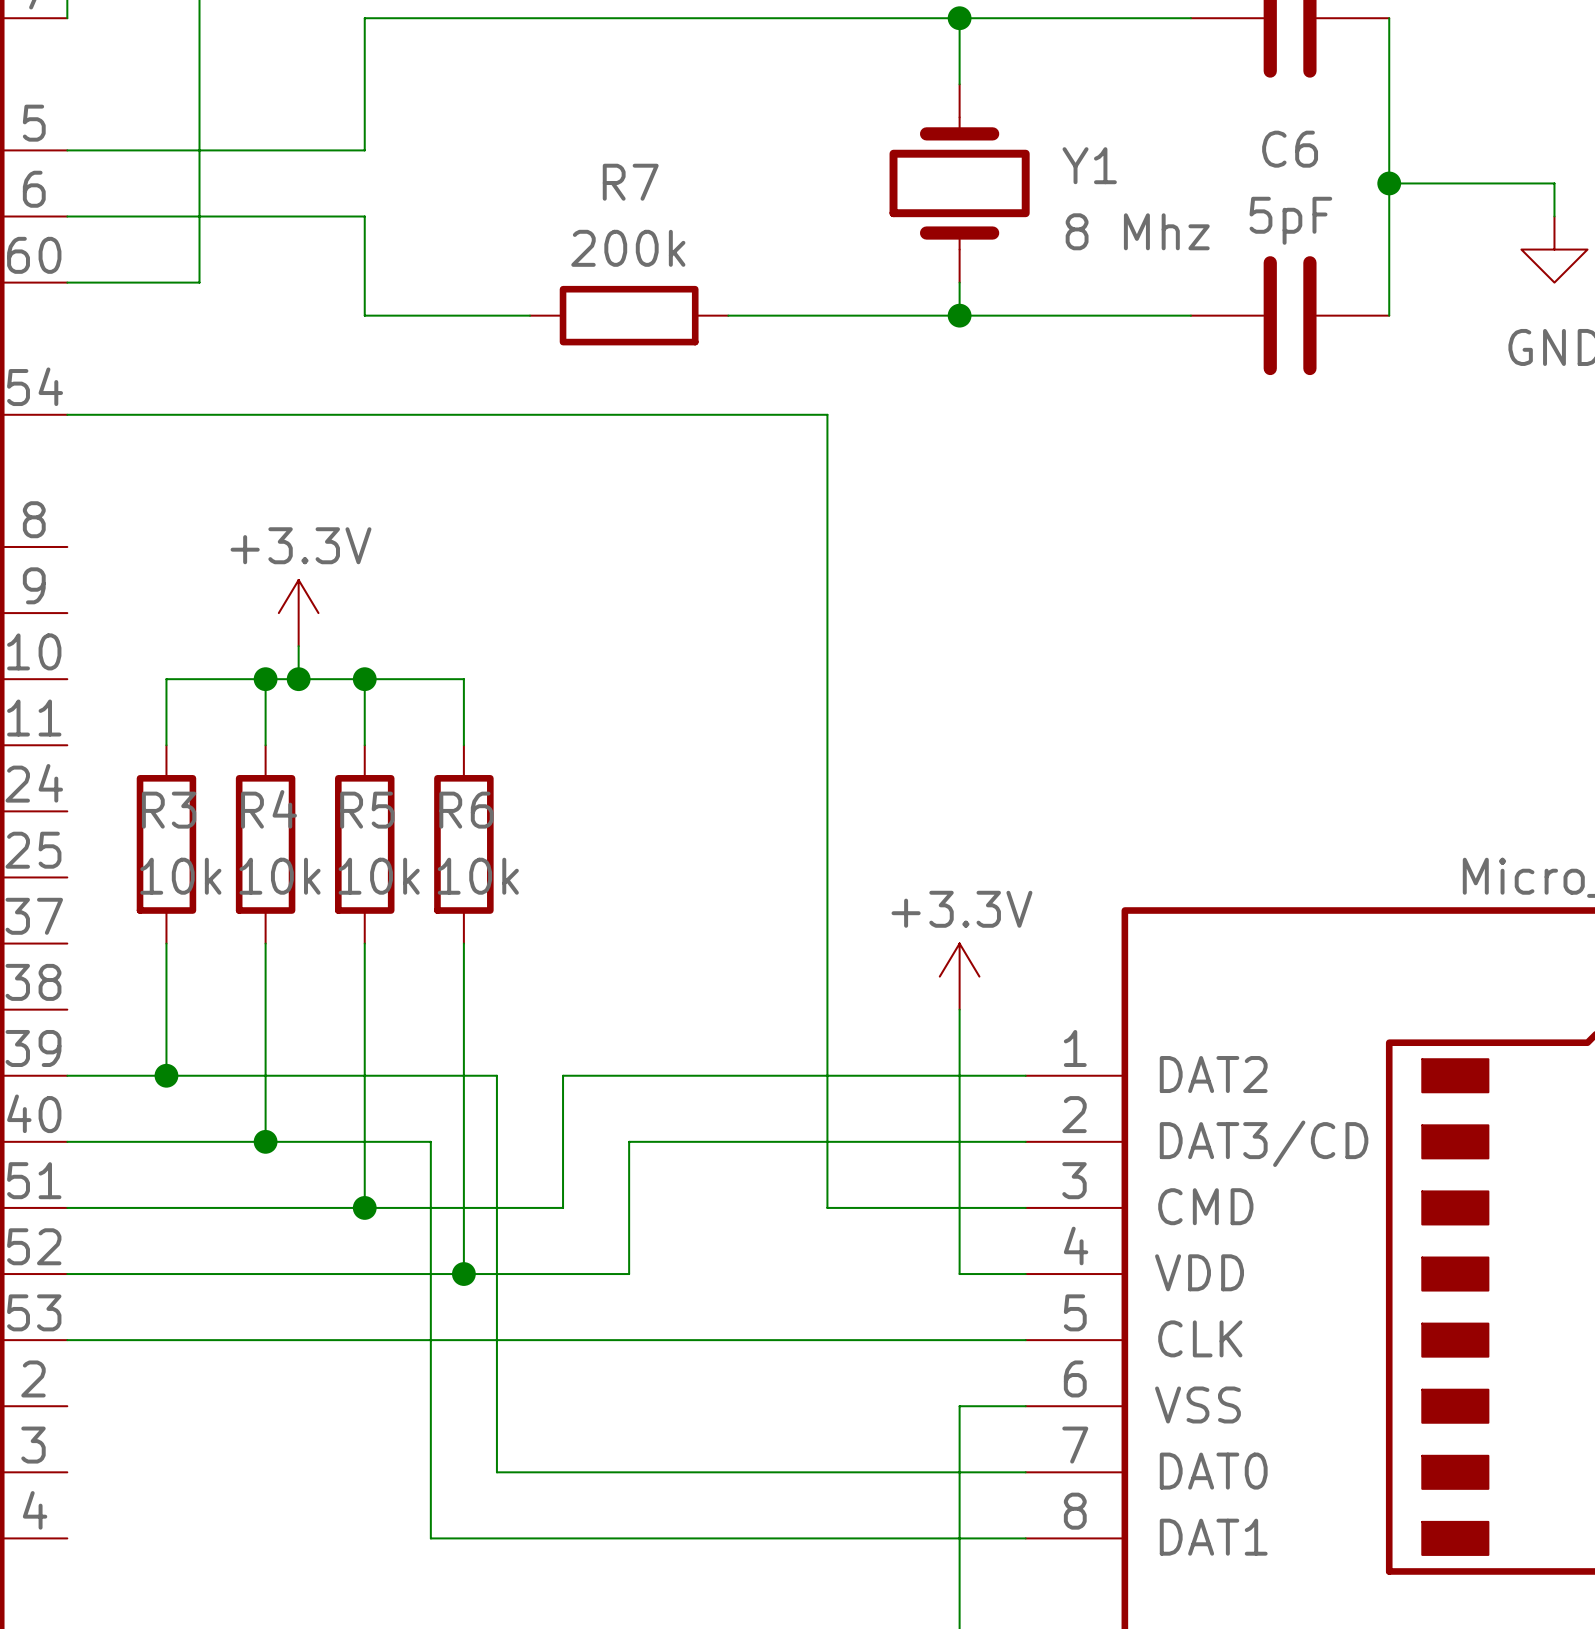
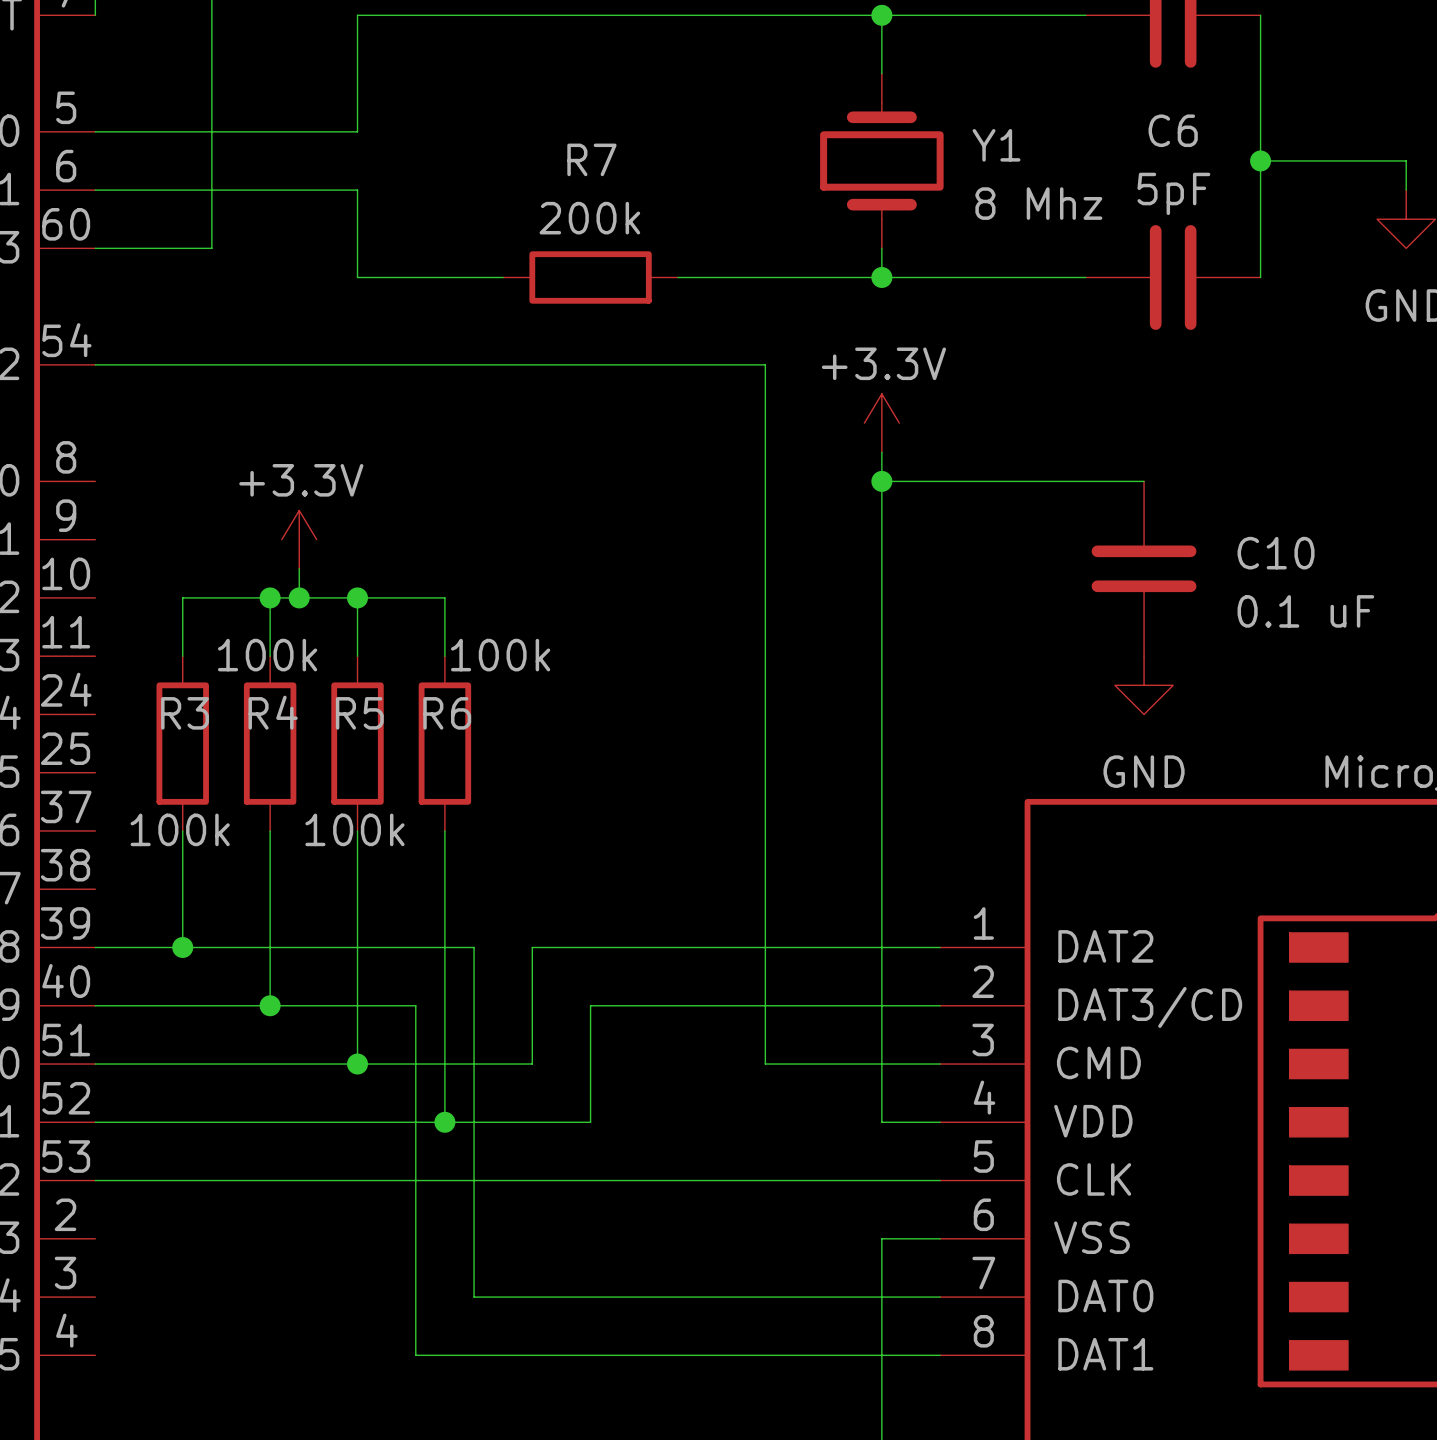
wire: none -> (881, 452) (881, 889)
wire: none -> (881, 481) (1144, 481)
junction: none -> (881, 481)
C10: none -> 0.1 uF (1144, 568)
power symbol: none -> GND (1144, 685)
R3 value: 10k (180, 876) -> 100k (180, 829)
R4 value: 10k (280, 876) -> 100k (267, 655)
R5 value: 10k (379, 876) -> 100k (354, 829)
R6 value: 10k (478, 876) -> 100k (500, 655)
power symbol position: +3.3V (959, 976) -> +3.3V (881, 423)

